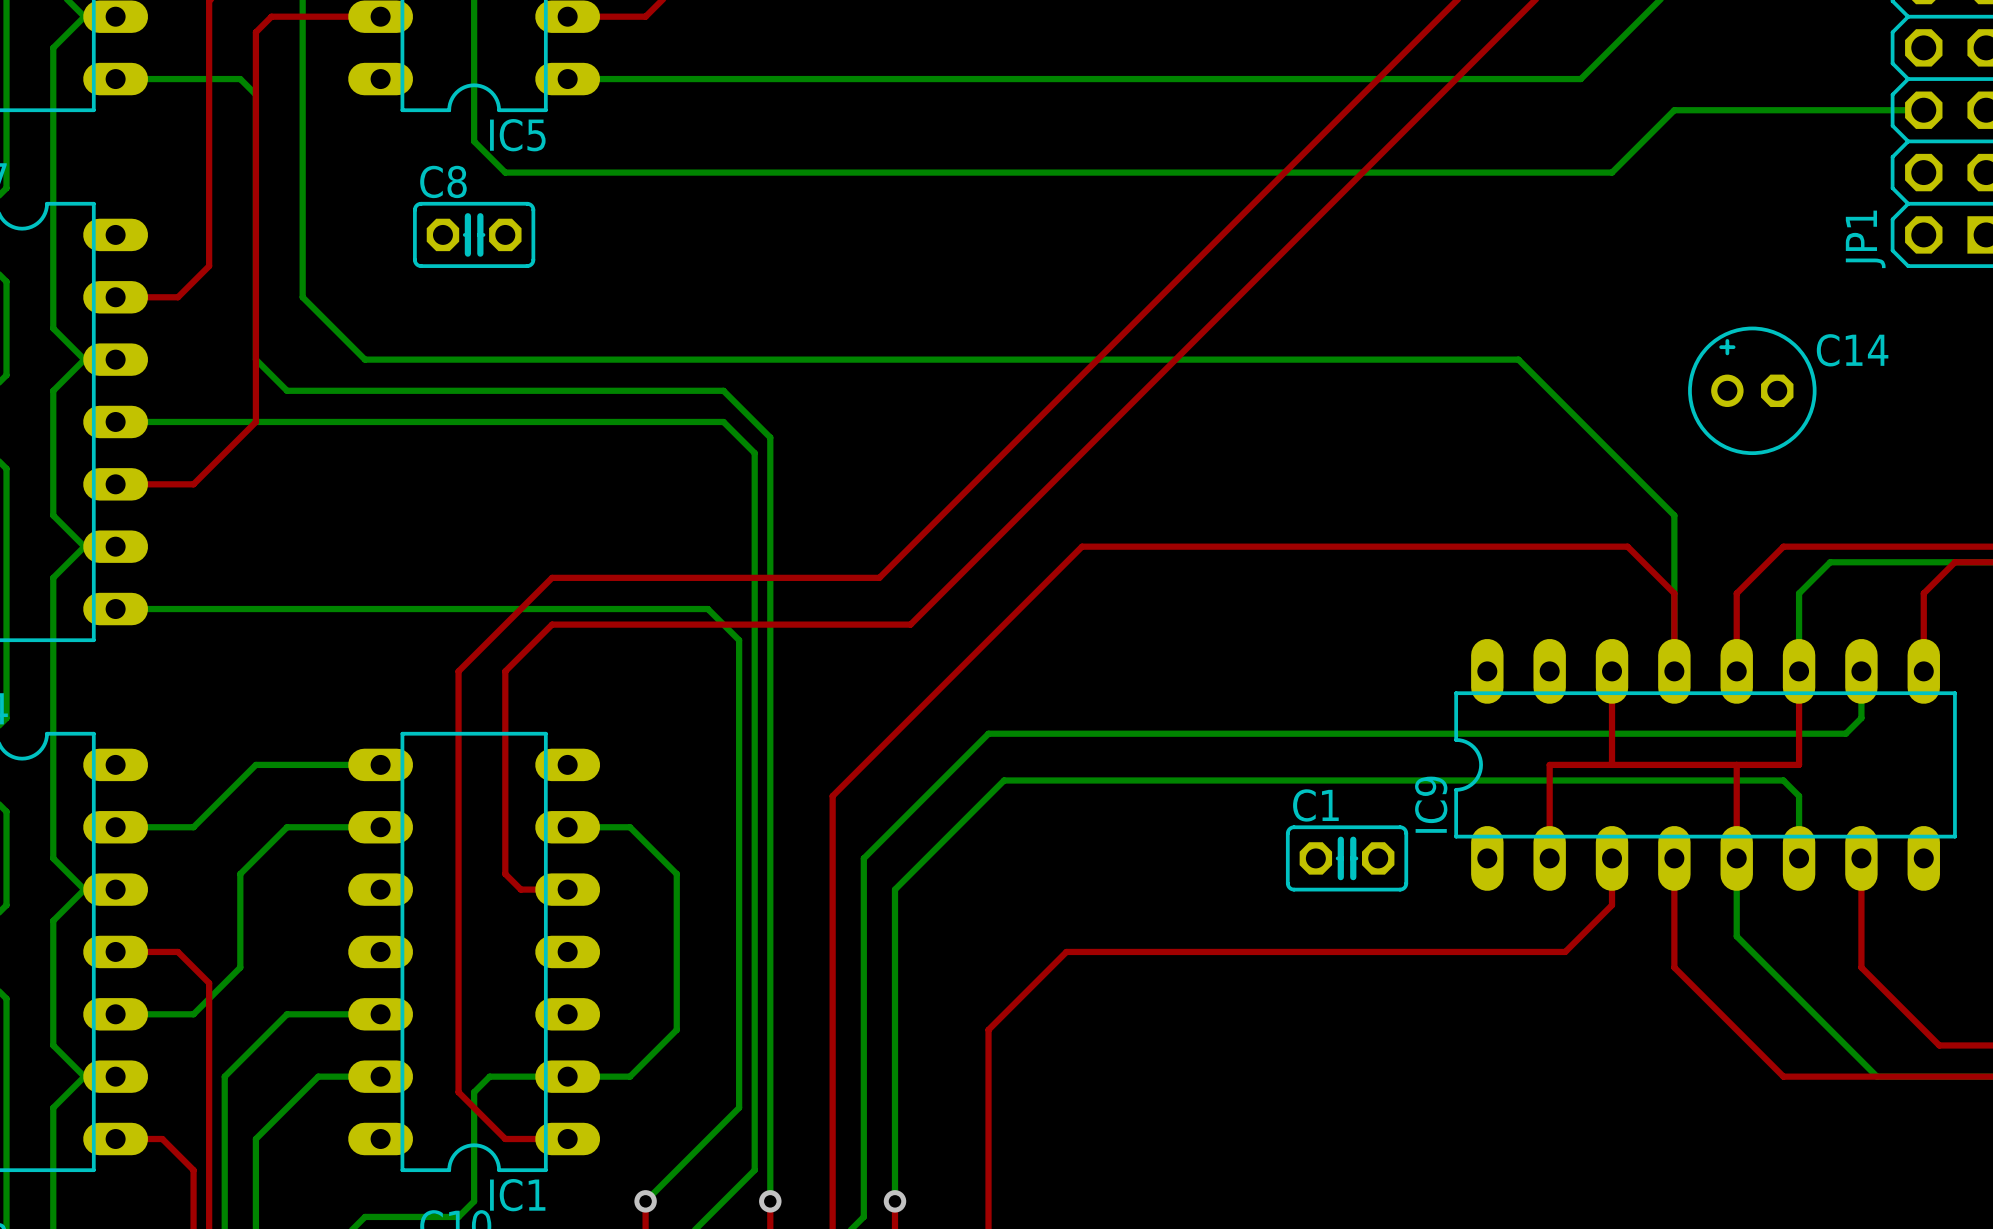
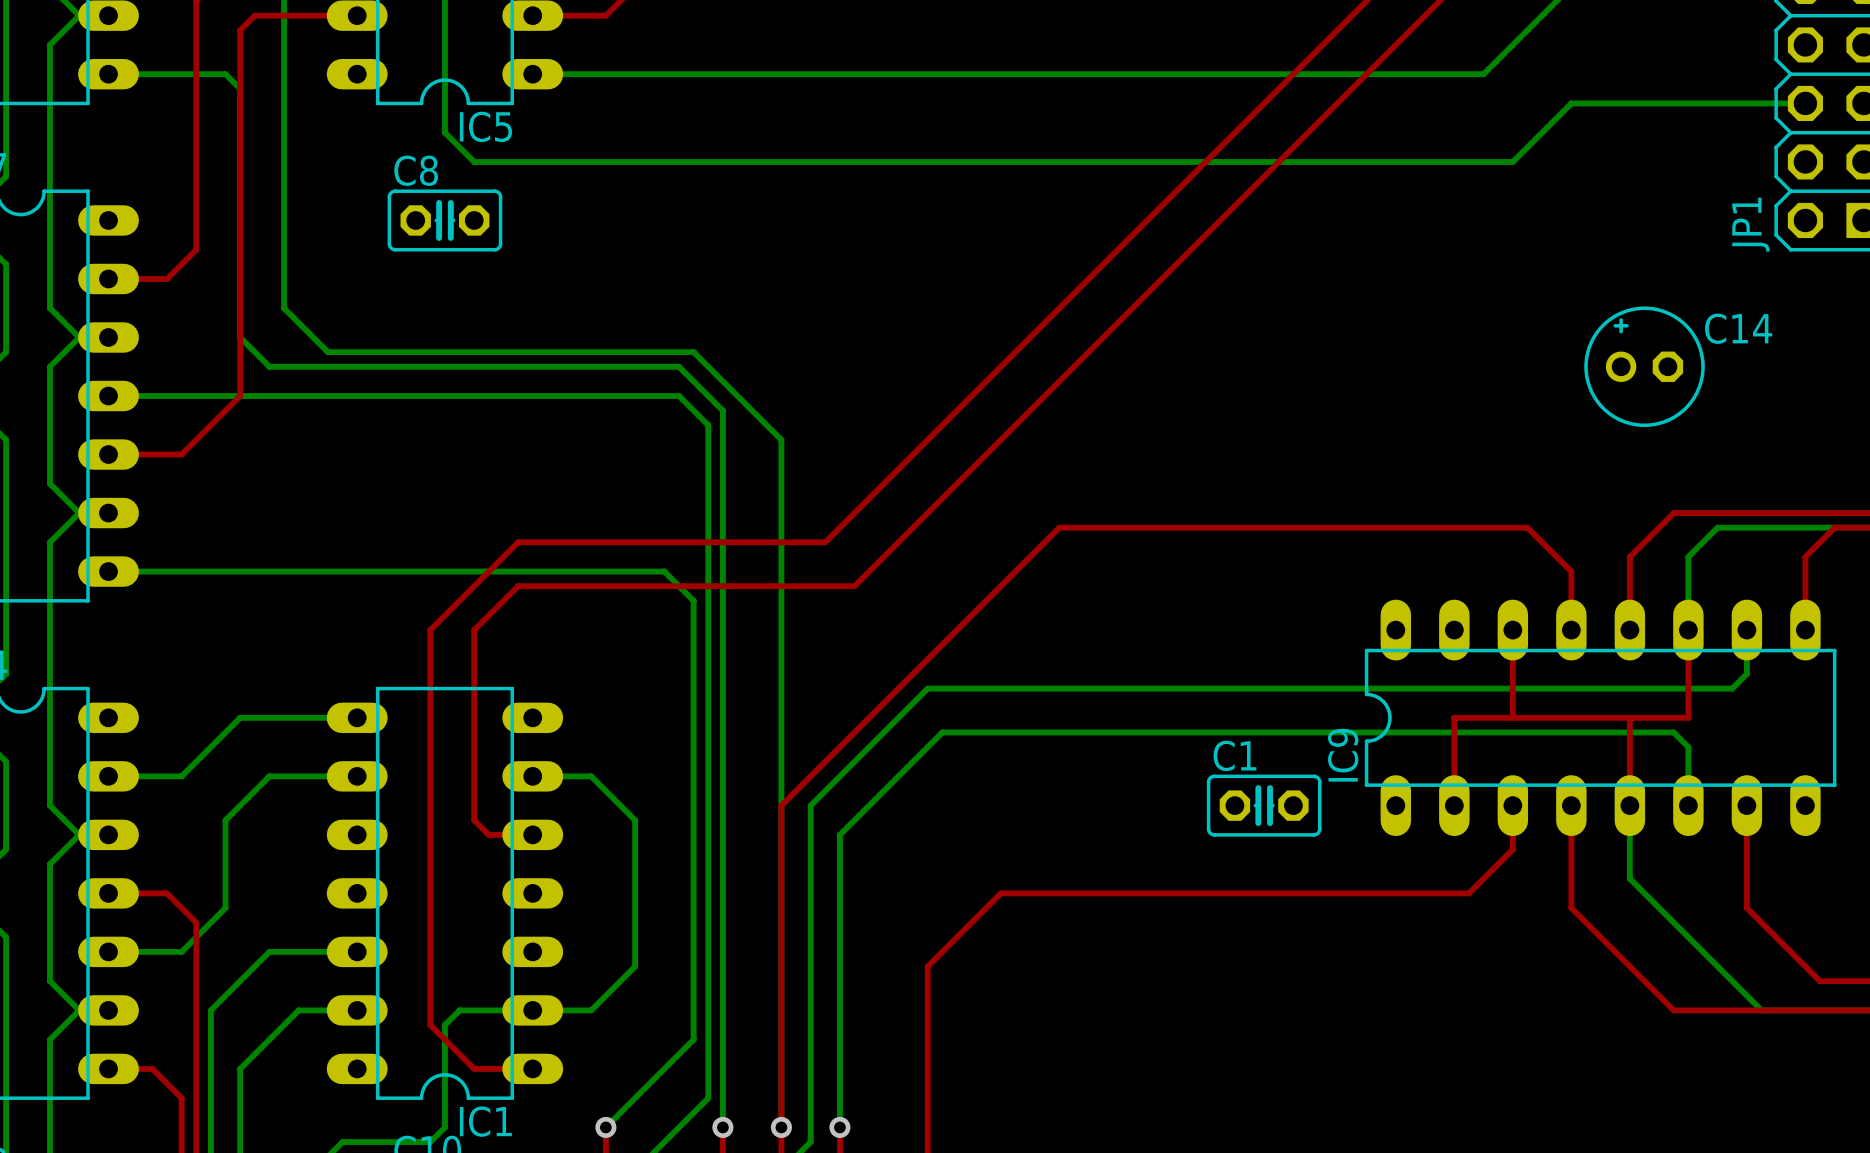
bottom track: (302, 297) (365, 359) (1518, 359) (1674, 515) (1674, 671) -> (284, 278) (284, 308) (327, 352) (693, 352) (781, 439) (781, 1127)
top track: (1674, 609) (1674, 593) (1627, 546) (1082, 546) (832, 796) (832, 858) -> (1571, 571) (1527, 527) (1059, 527) (781, 805)
via: none -> (781, 1127)

